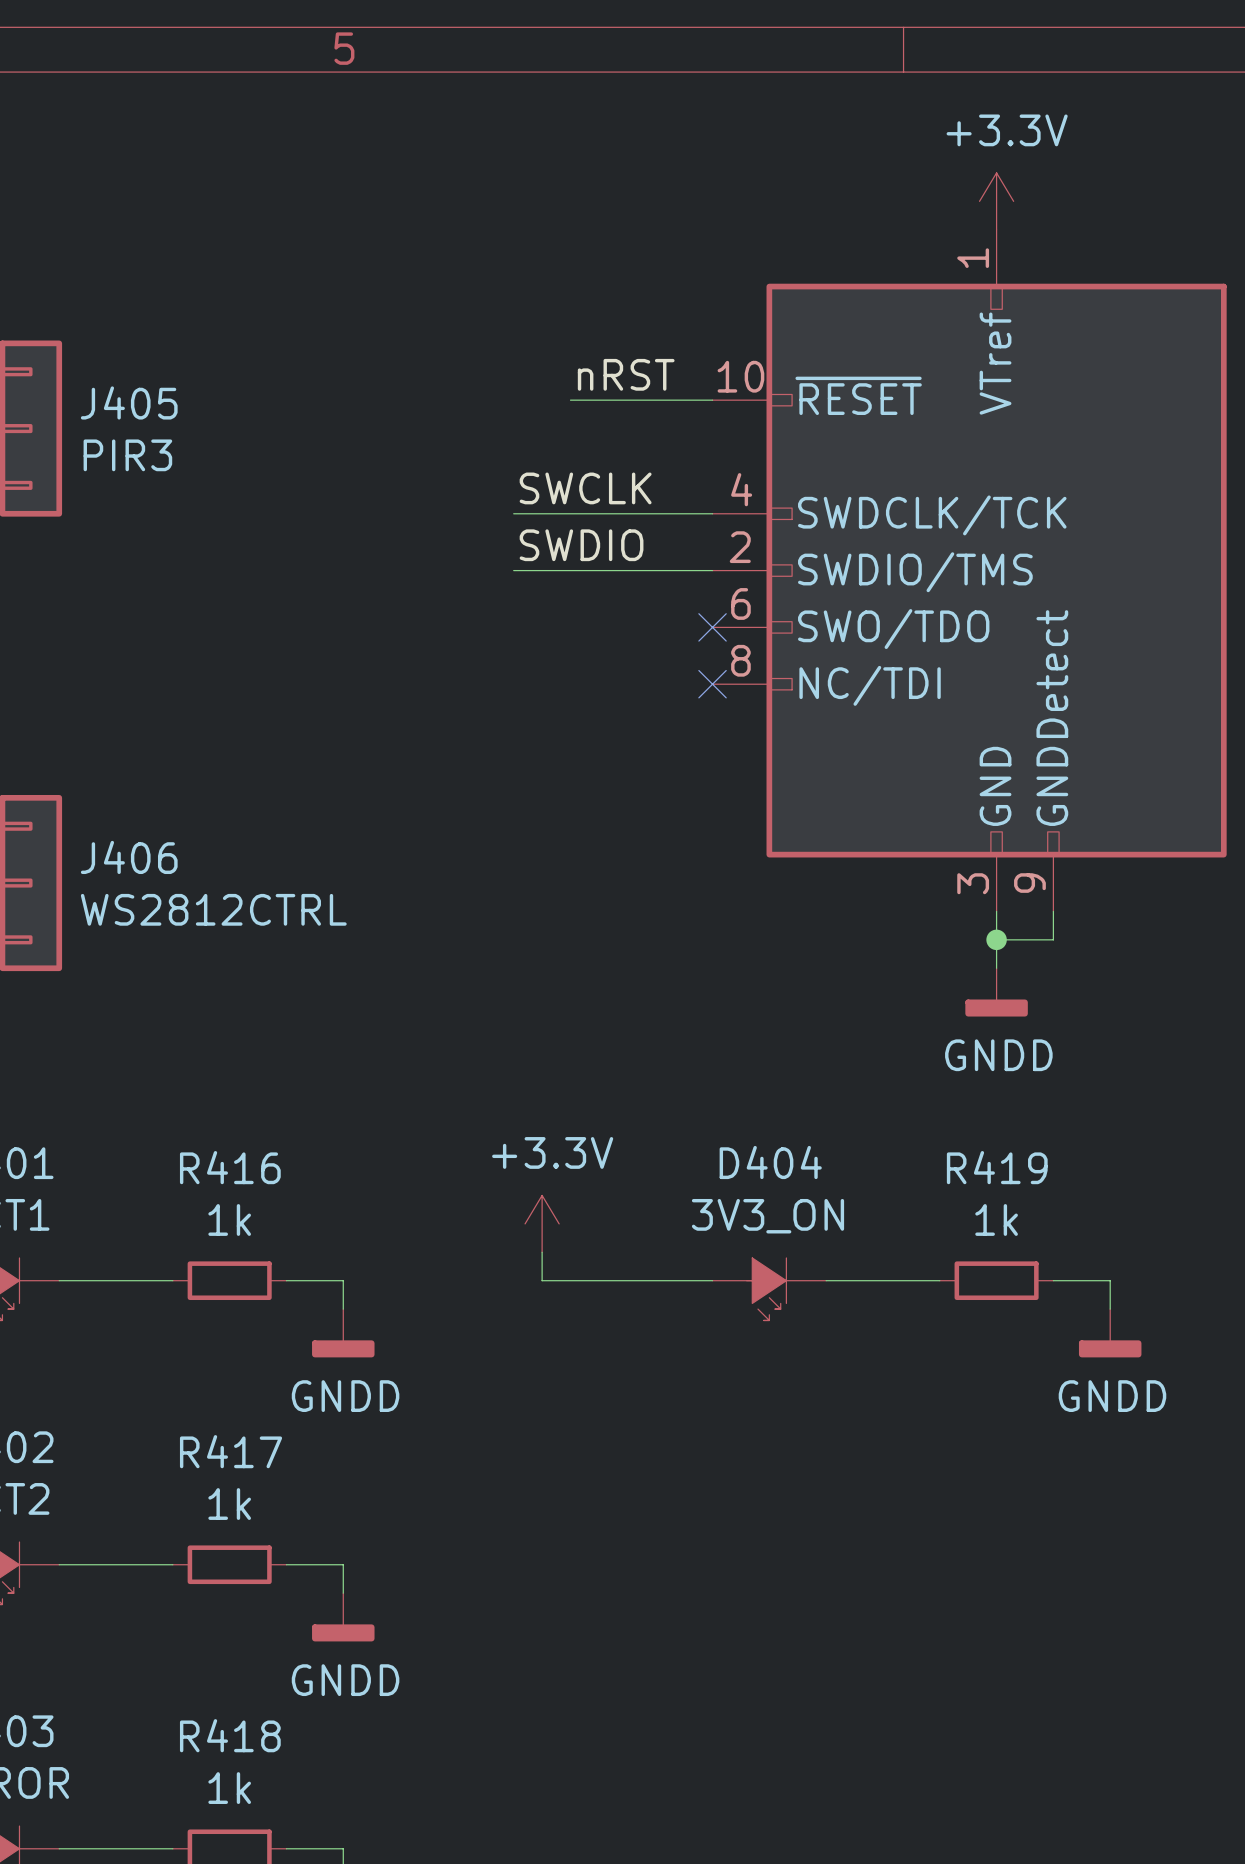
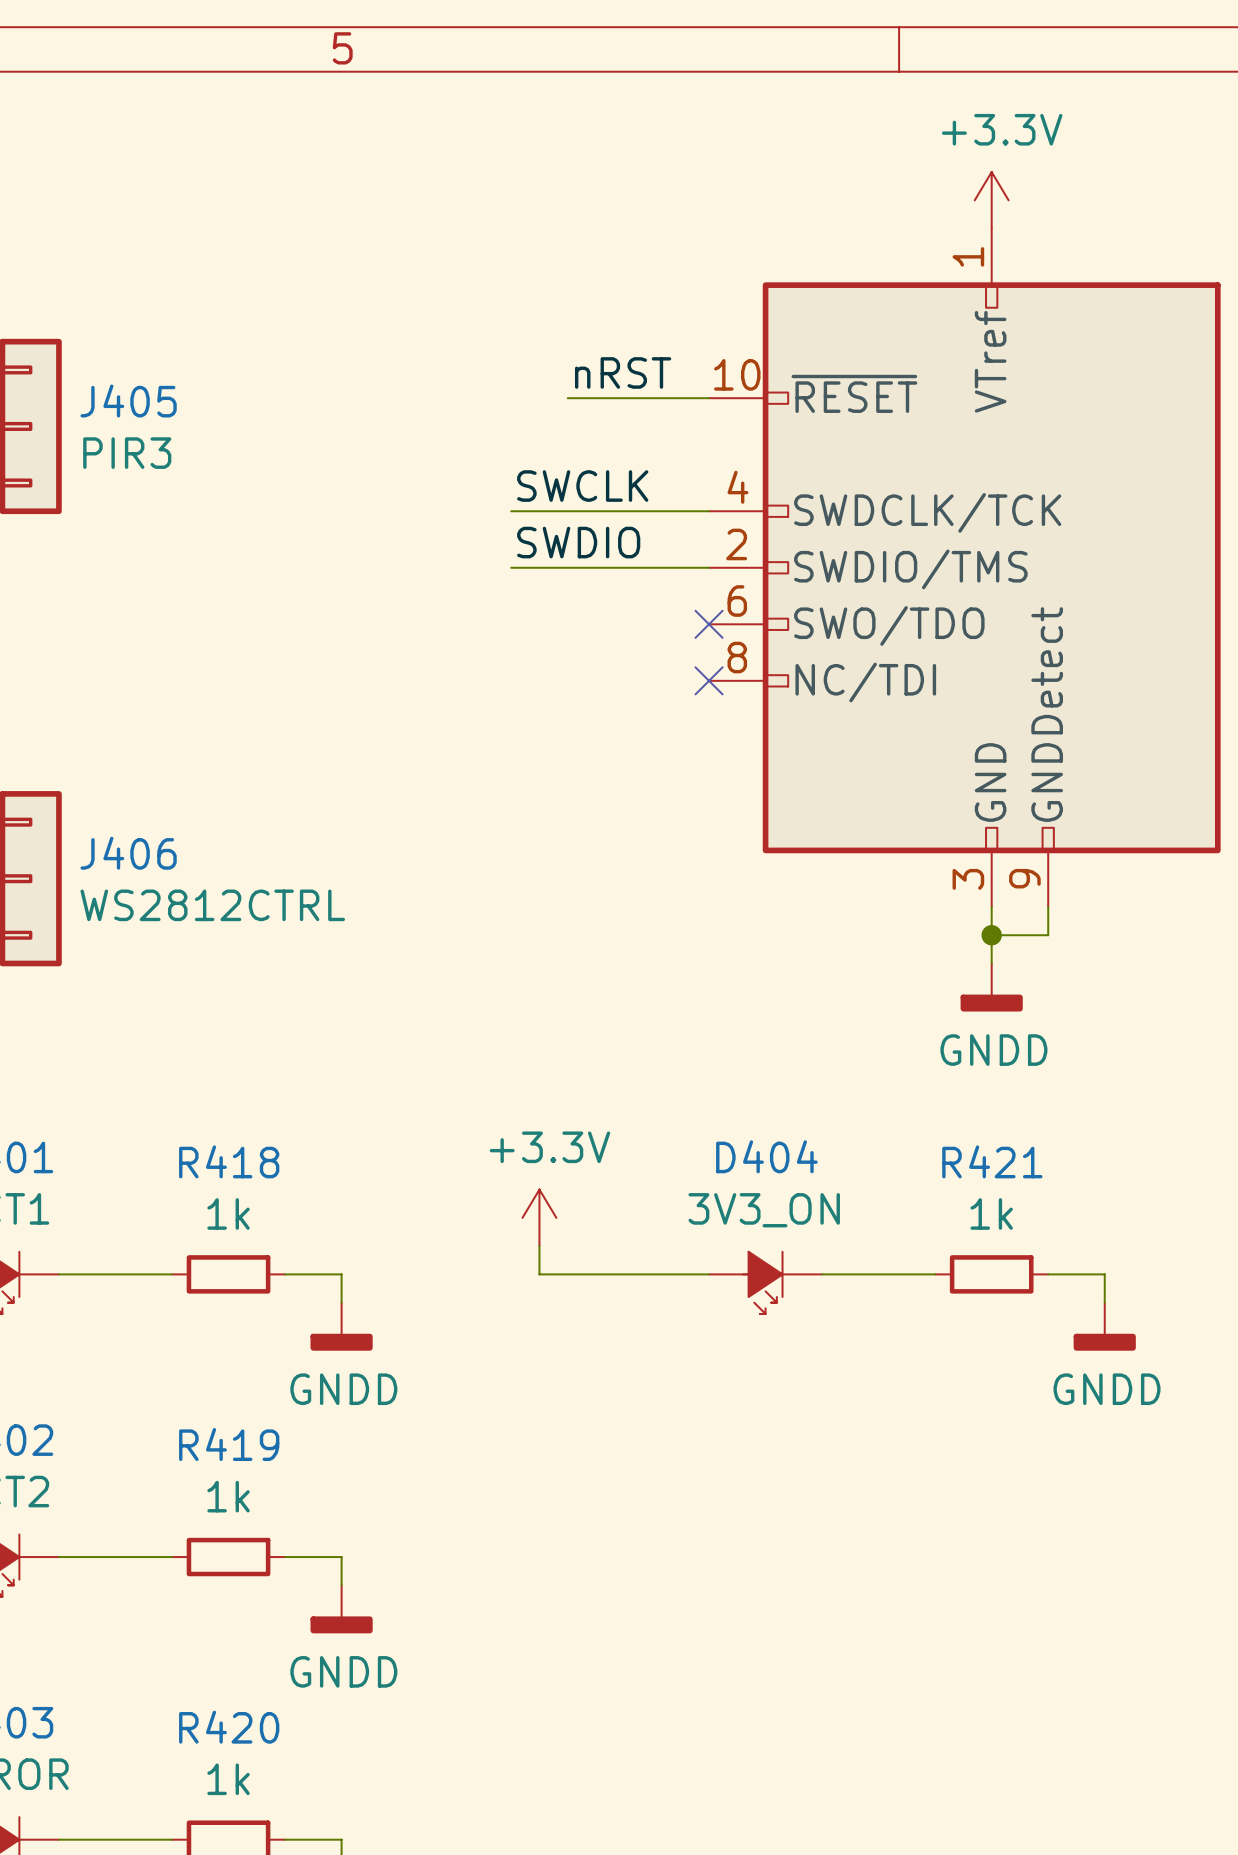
R416 name: R416 (230, 1167) -> R418 (229, 1161)
R419 name: R419 (997, 1167) -> R421 (992, 1161)
R417 name: R417 (231, 1451) -> R419 (229, 1444)
R418 name: R418 (230, 1735) -> R420 (229, 1727)

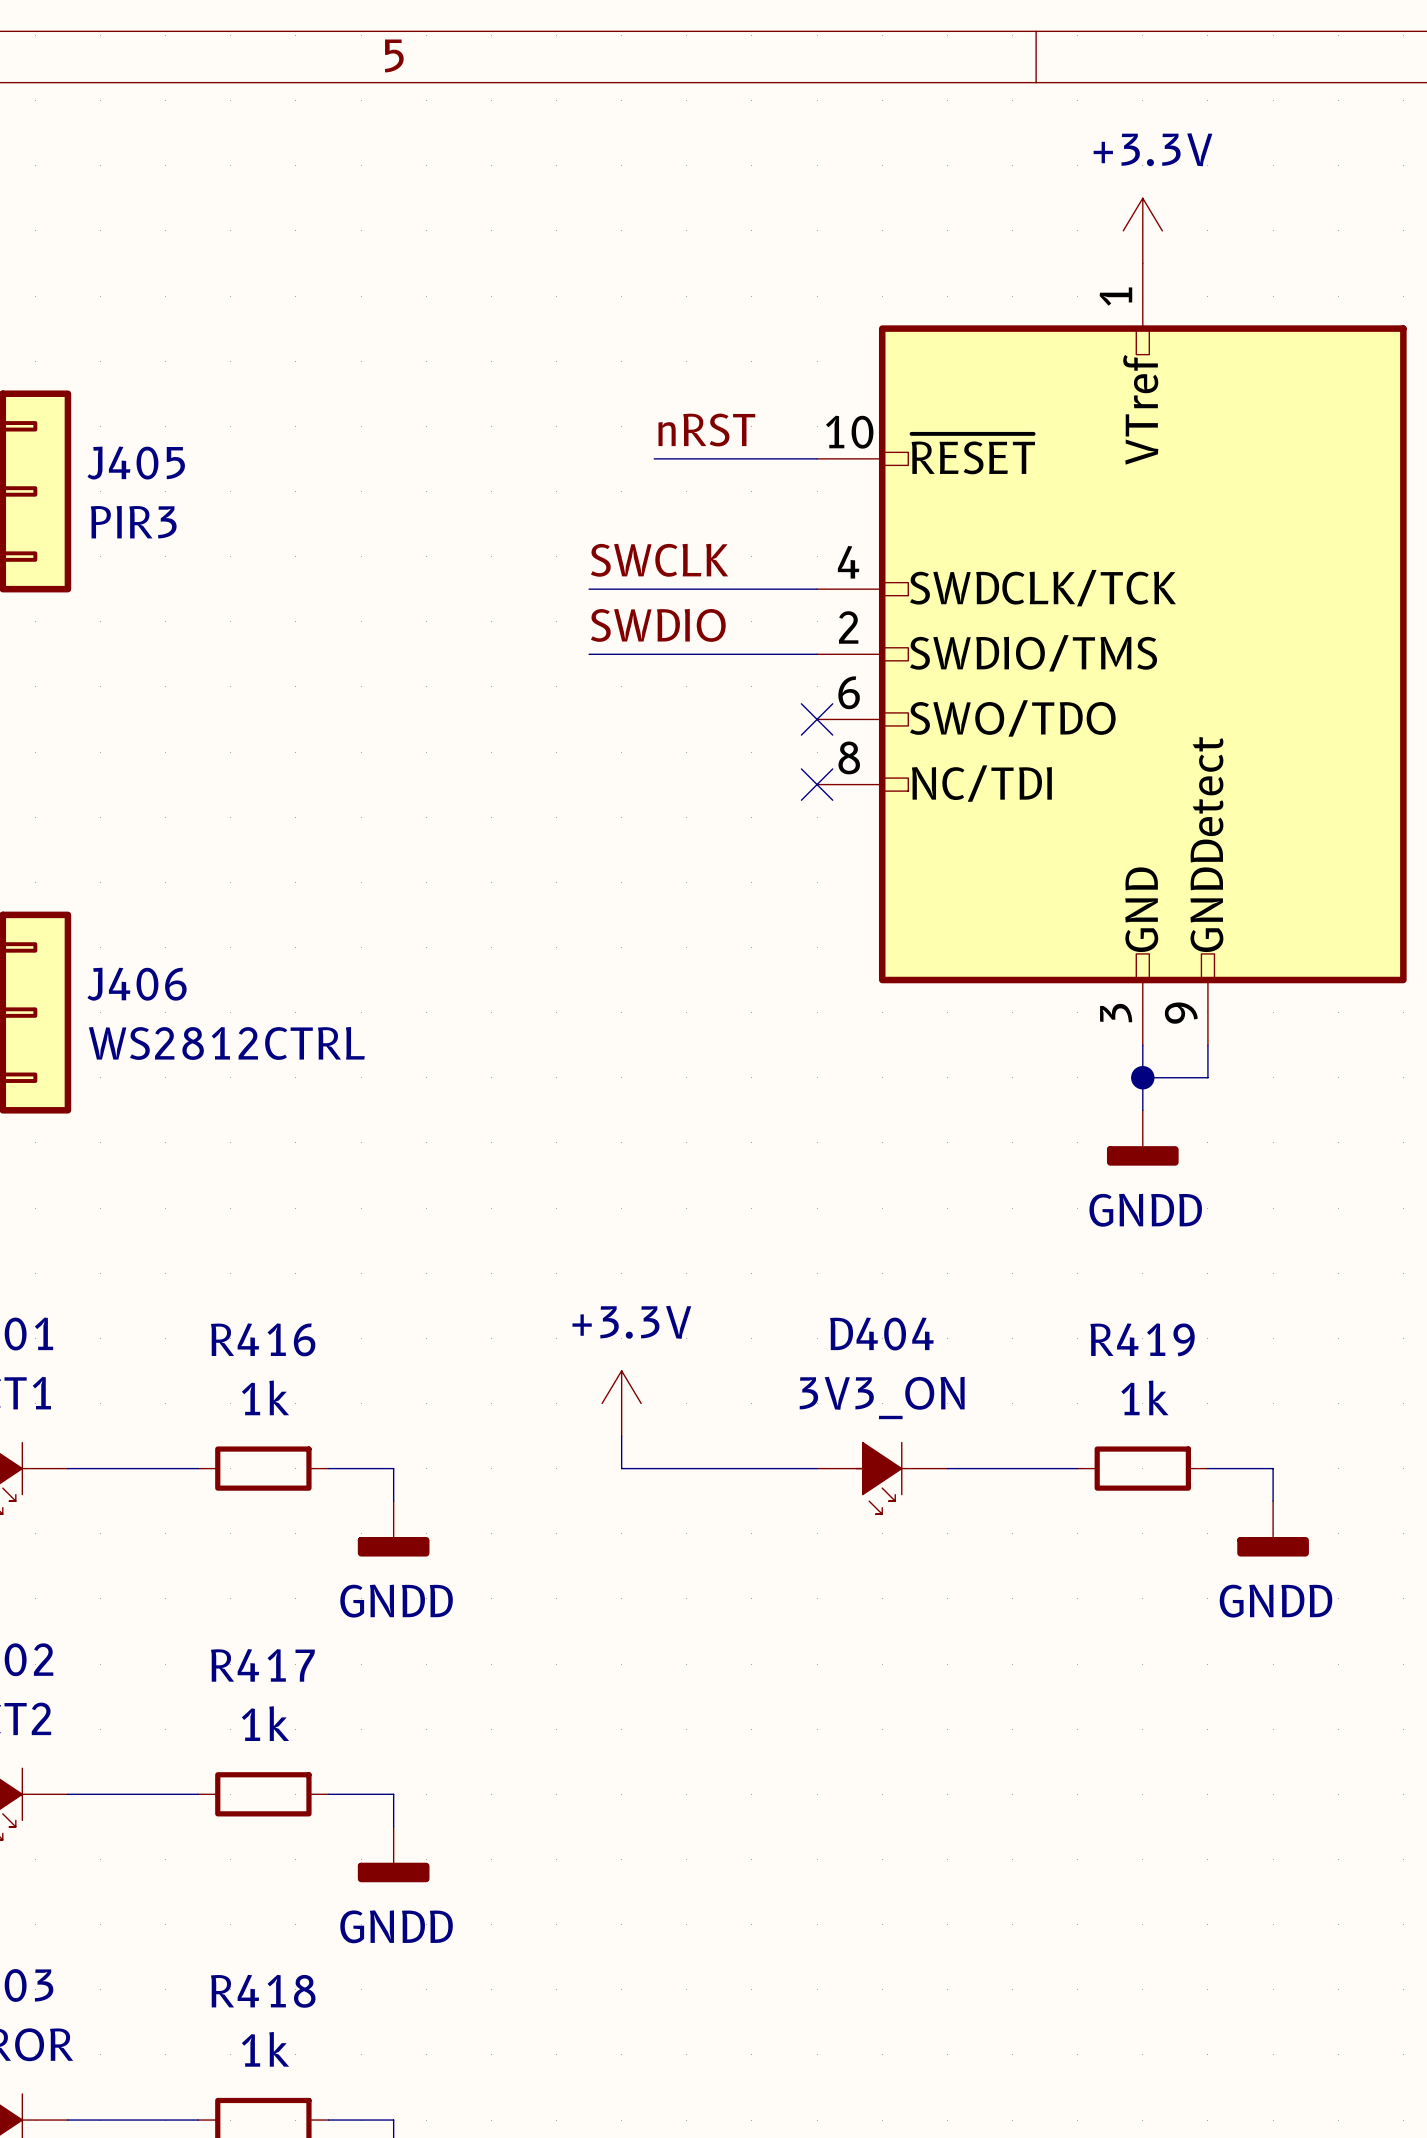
R418 name: R418 (229, 1161) -> R416 (263, 1339)
R421 name: R421 (992, 1161) -> R419 (1142, 1339)
R419 name: R419 (229, 1444) -> R417 (262, 1665)
R420 name: R420 (229, 1727) -> R418 (263, 1991)

